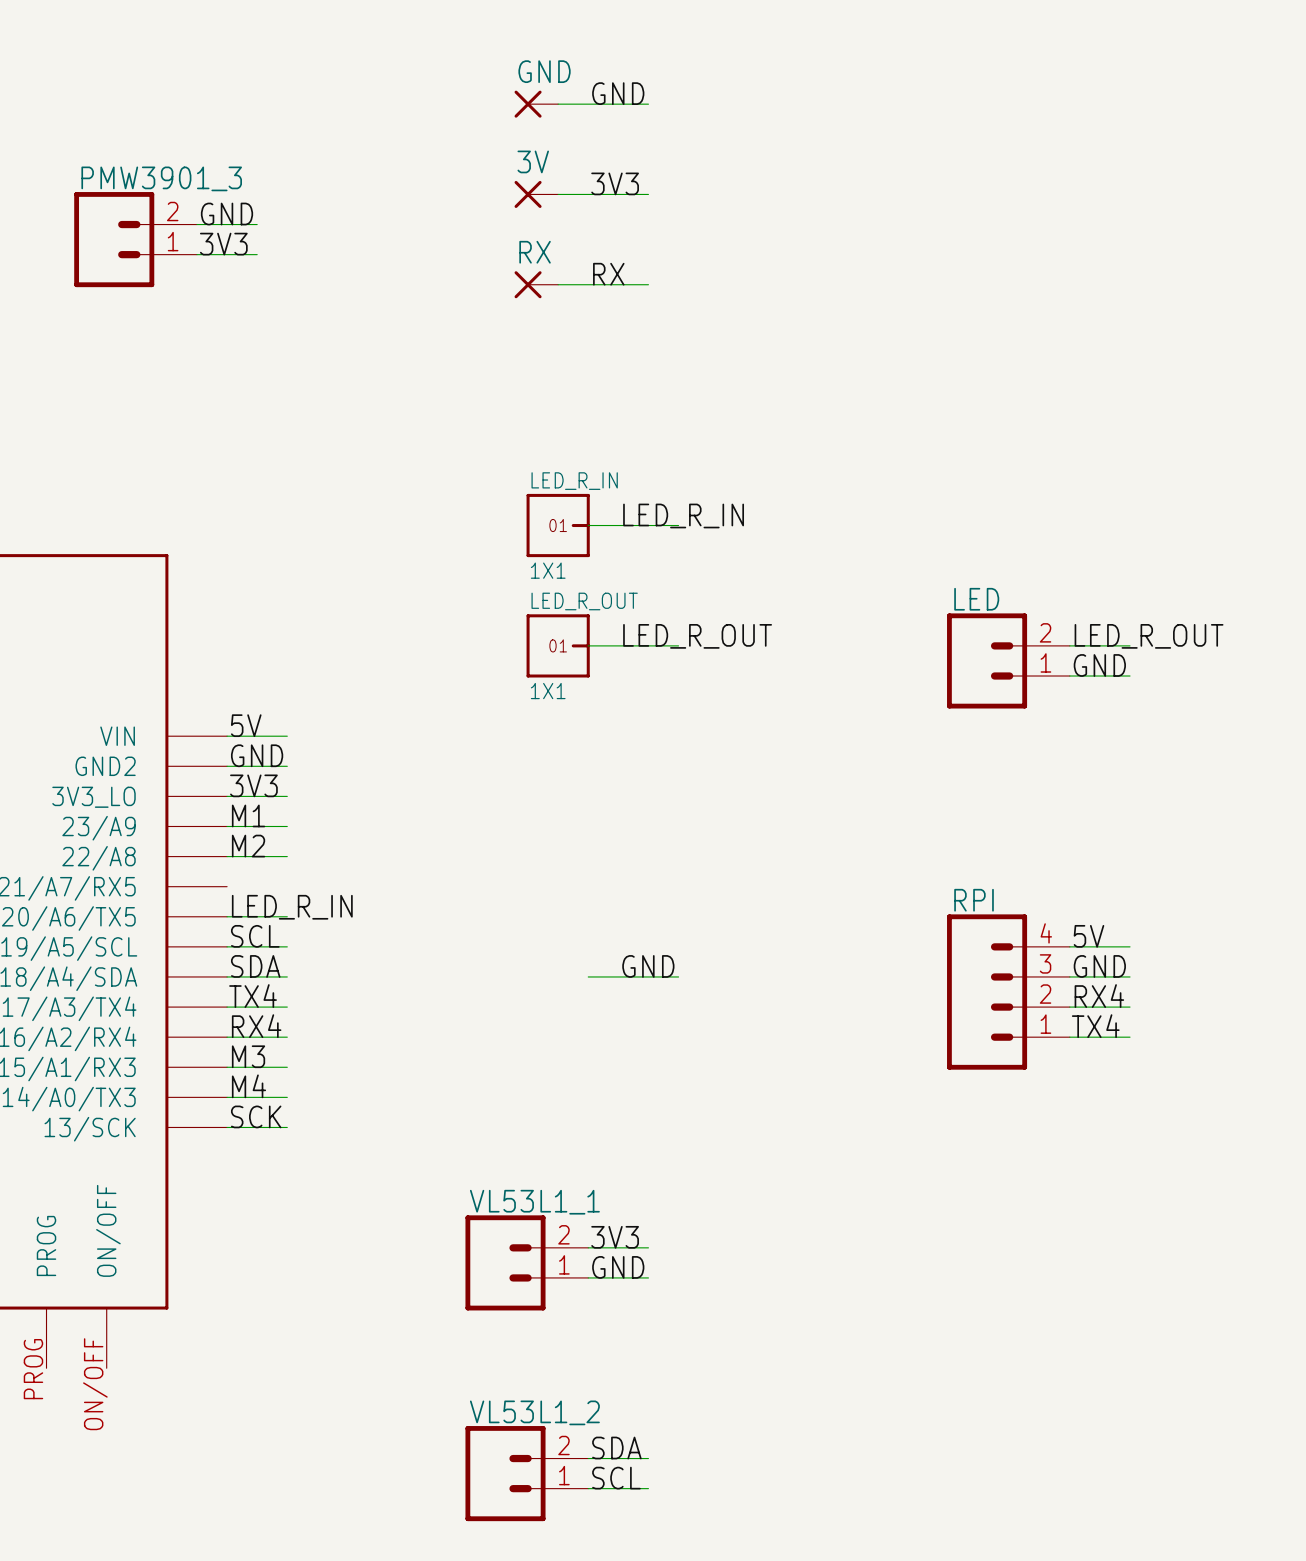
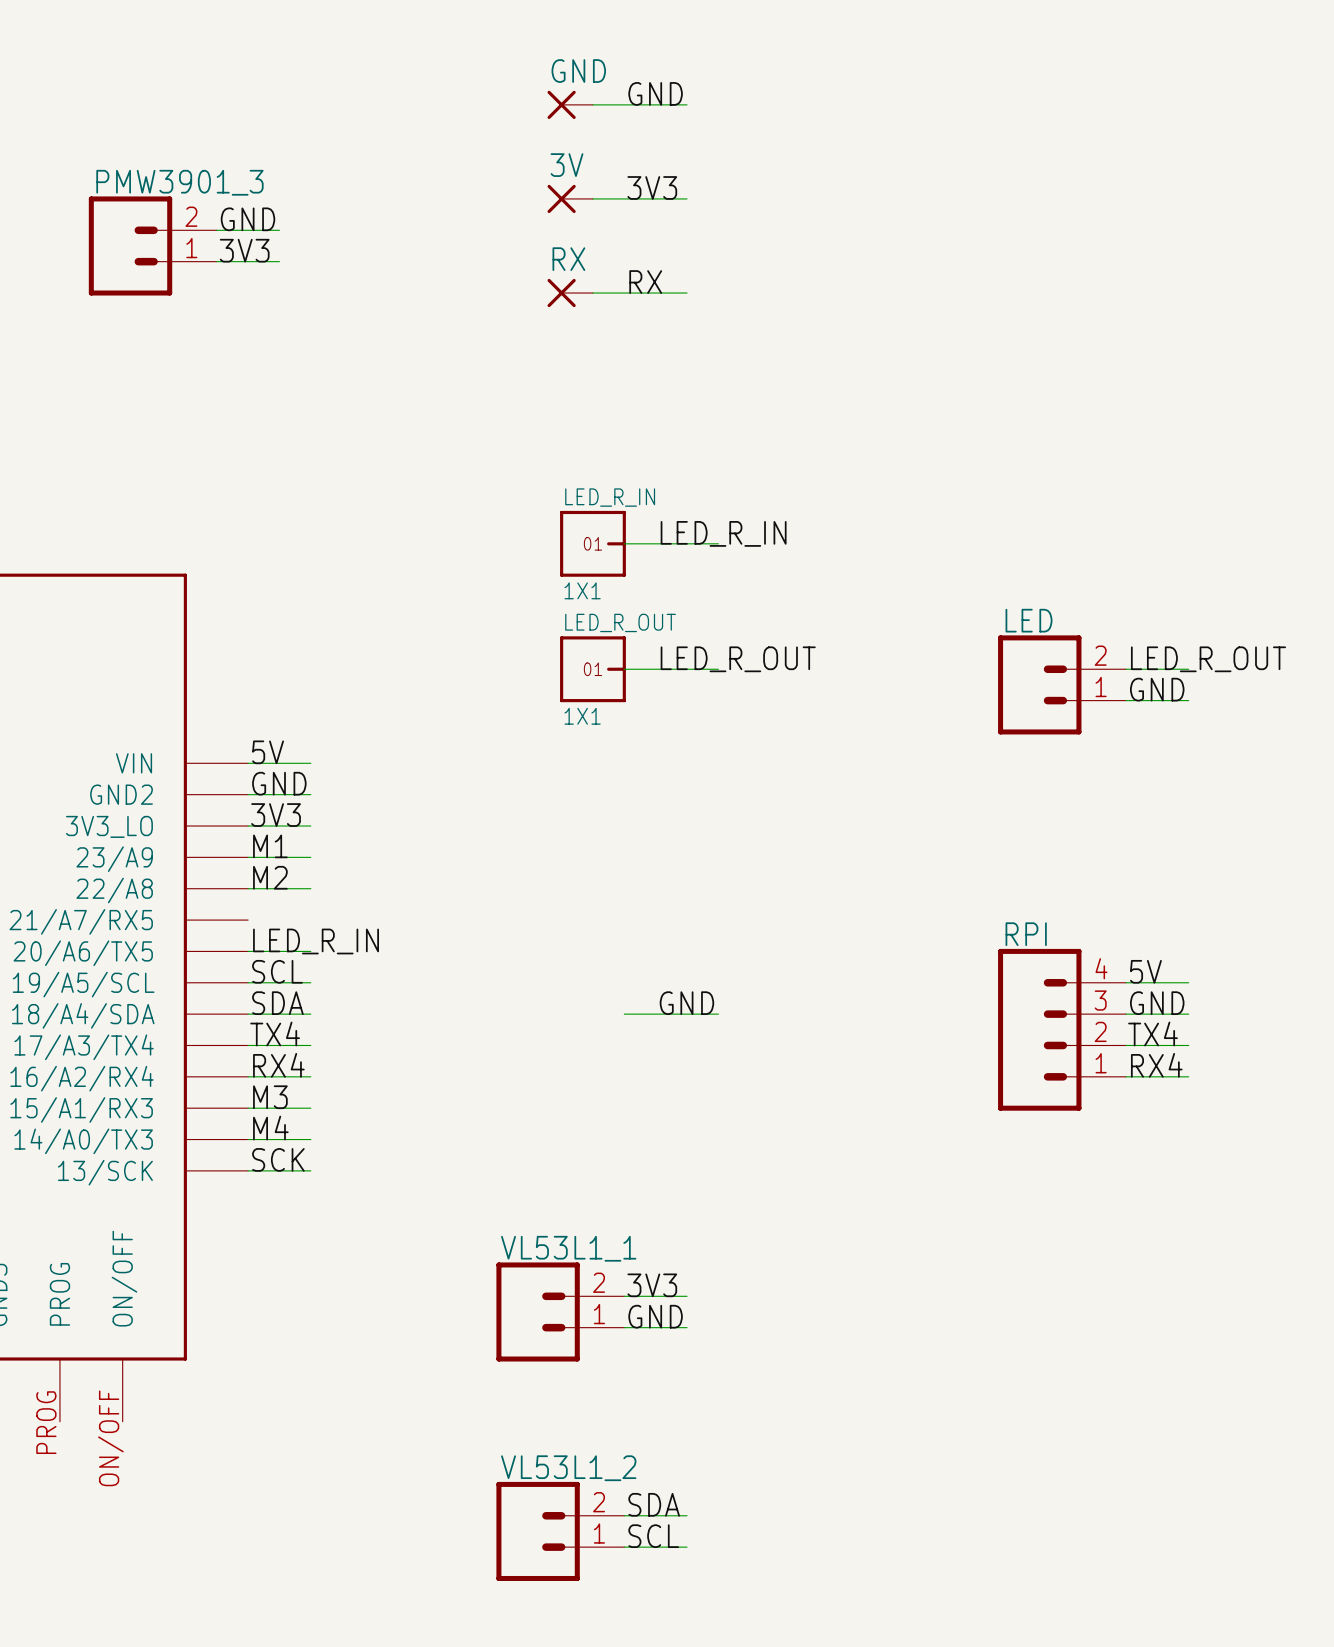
label: RX4 (1099, 996) -> TX4 (1152, 1033)
label: TX4 (1095, 1026) -> RX4 (1156, 1065)

